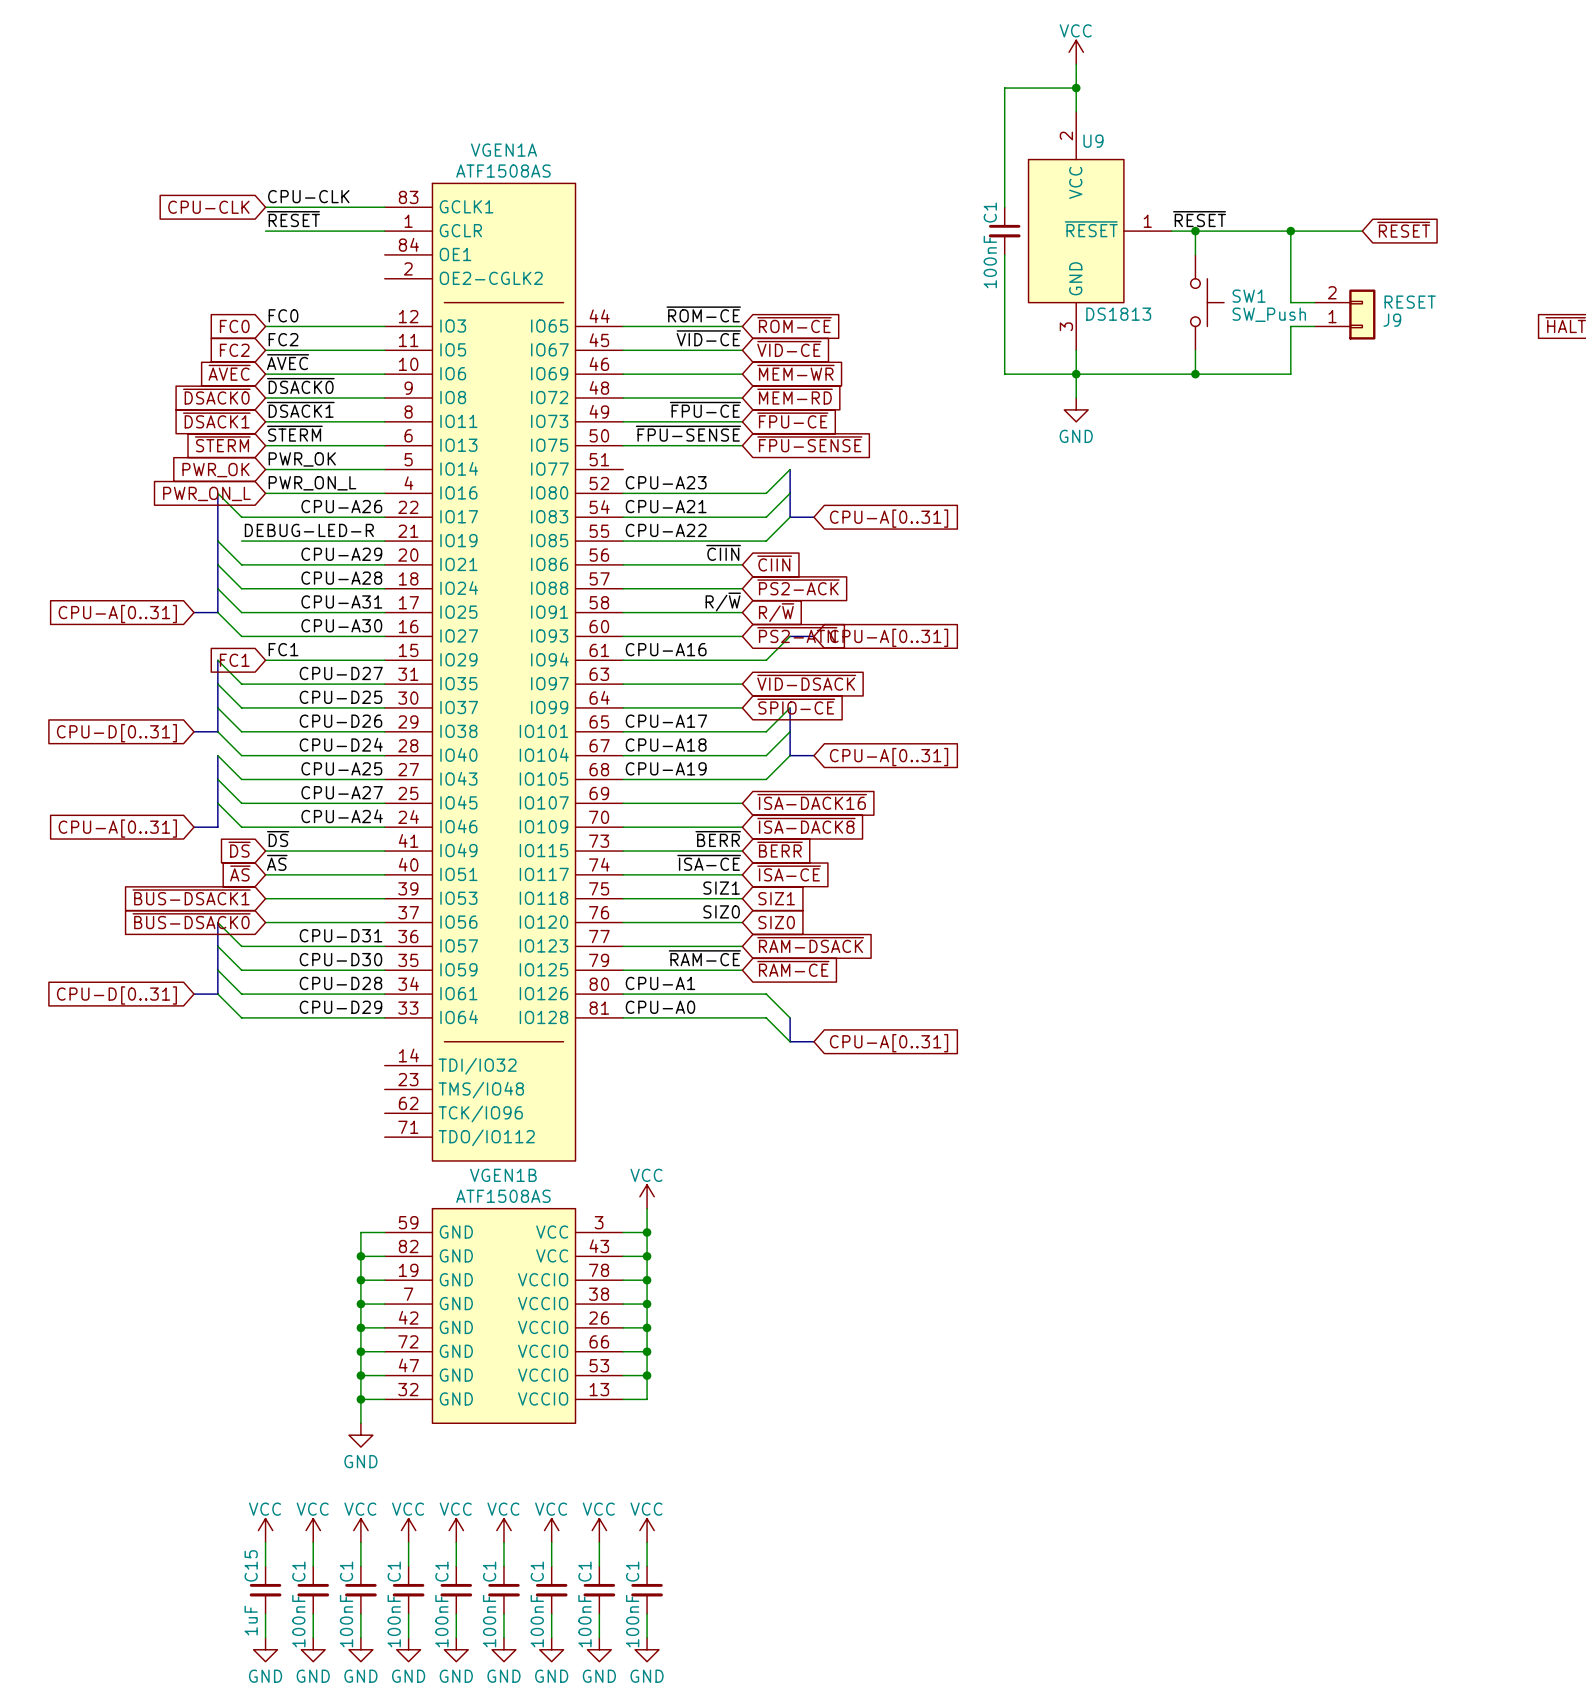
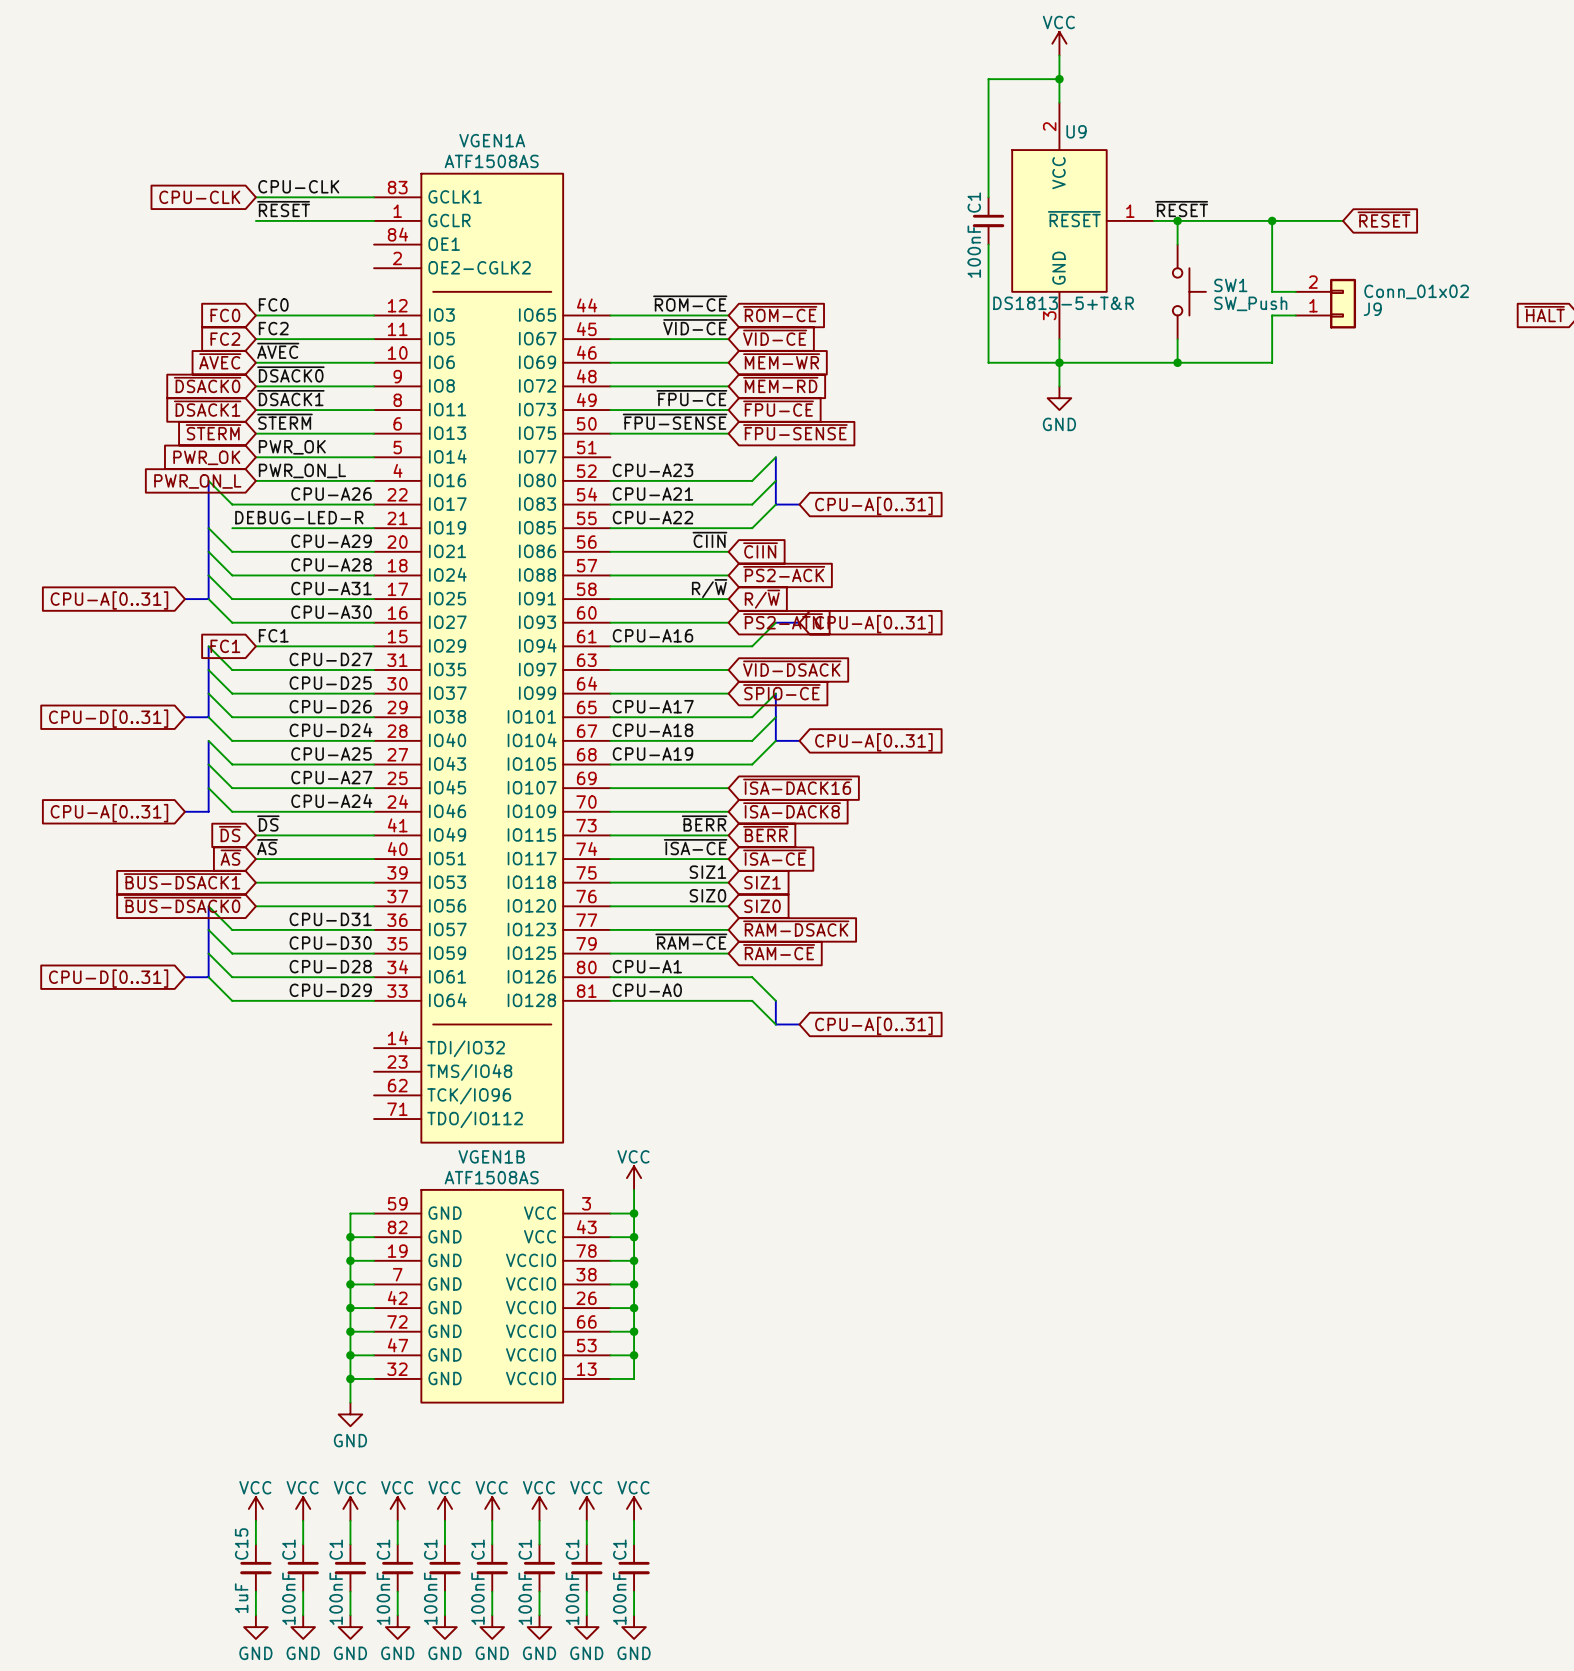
J9 value: RESET (1410, 302) -> Conn_01x02 (1416, 291)
U9 value: DS1813 (1118, 314) -> DS1813-5+T&R (1063, 303)

